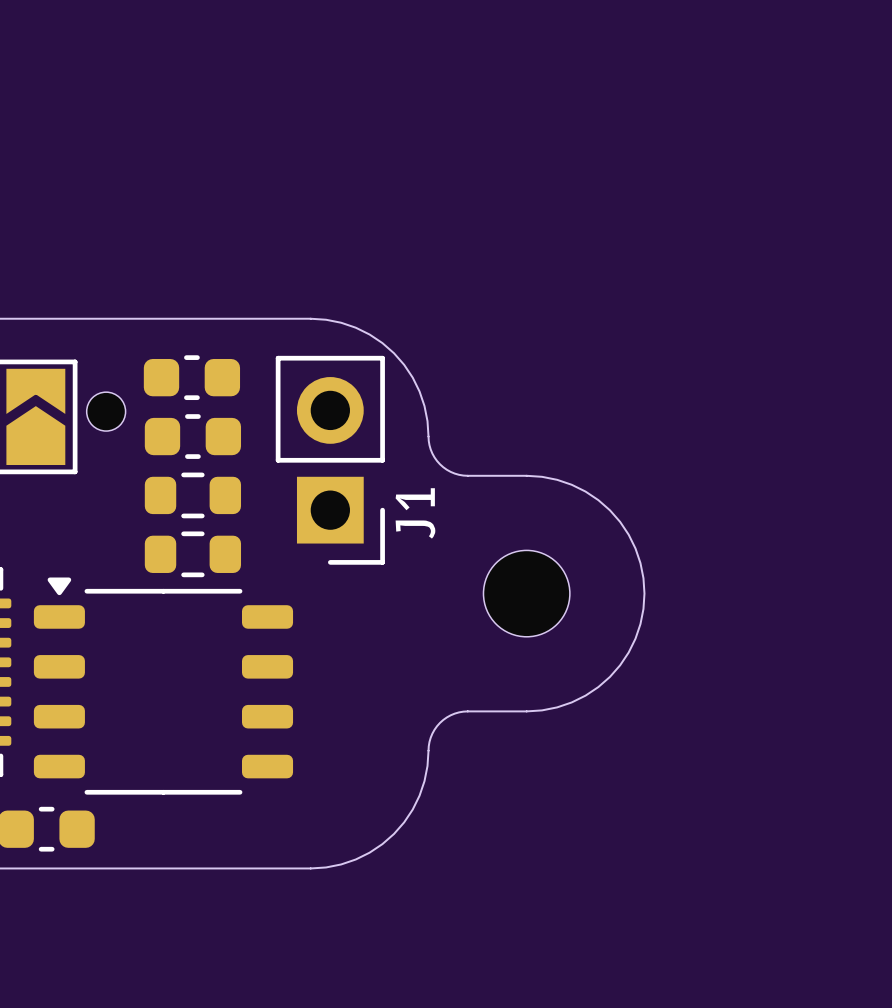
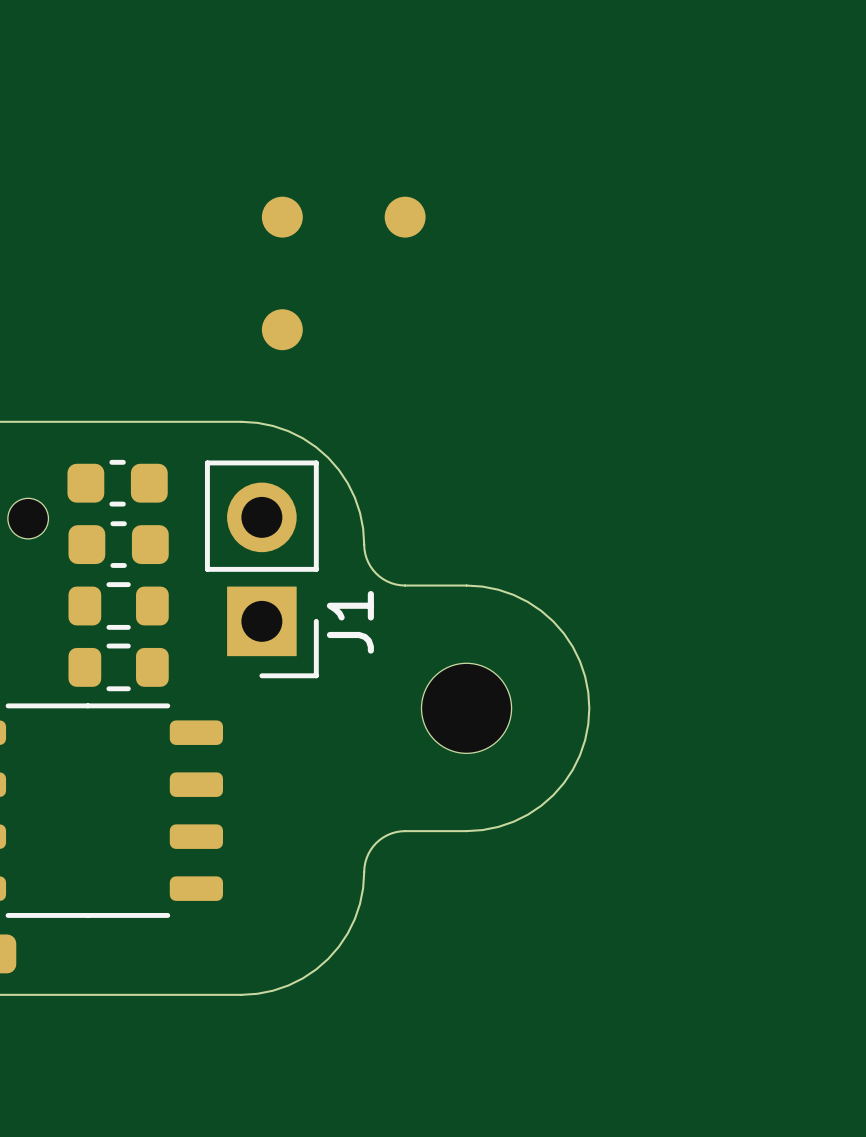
part: none -> (282, 217)
part: none -> (405, 217)
part: none -> (282, 329)

